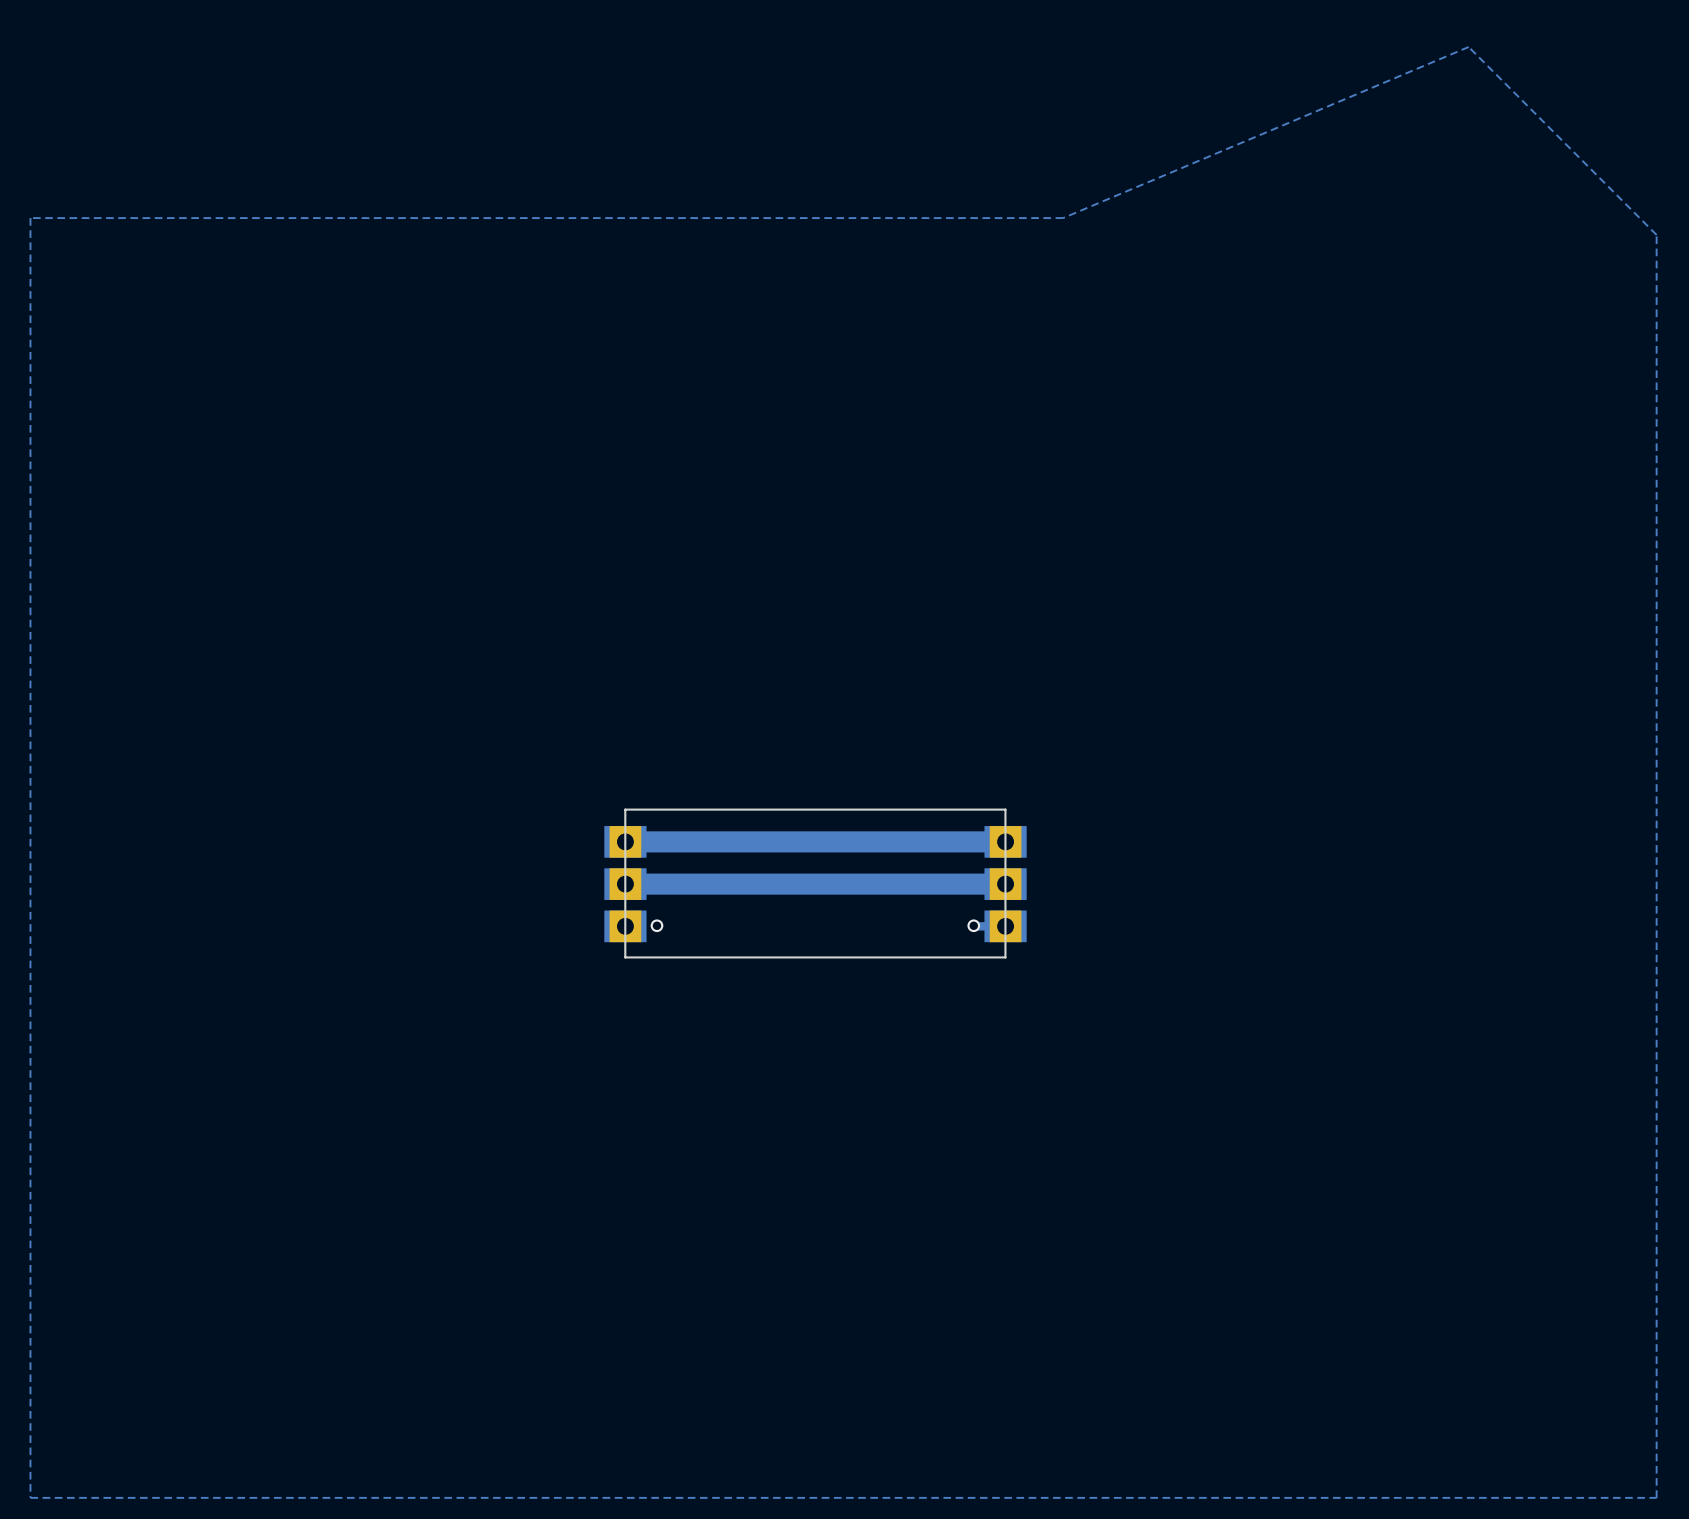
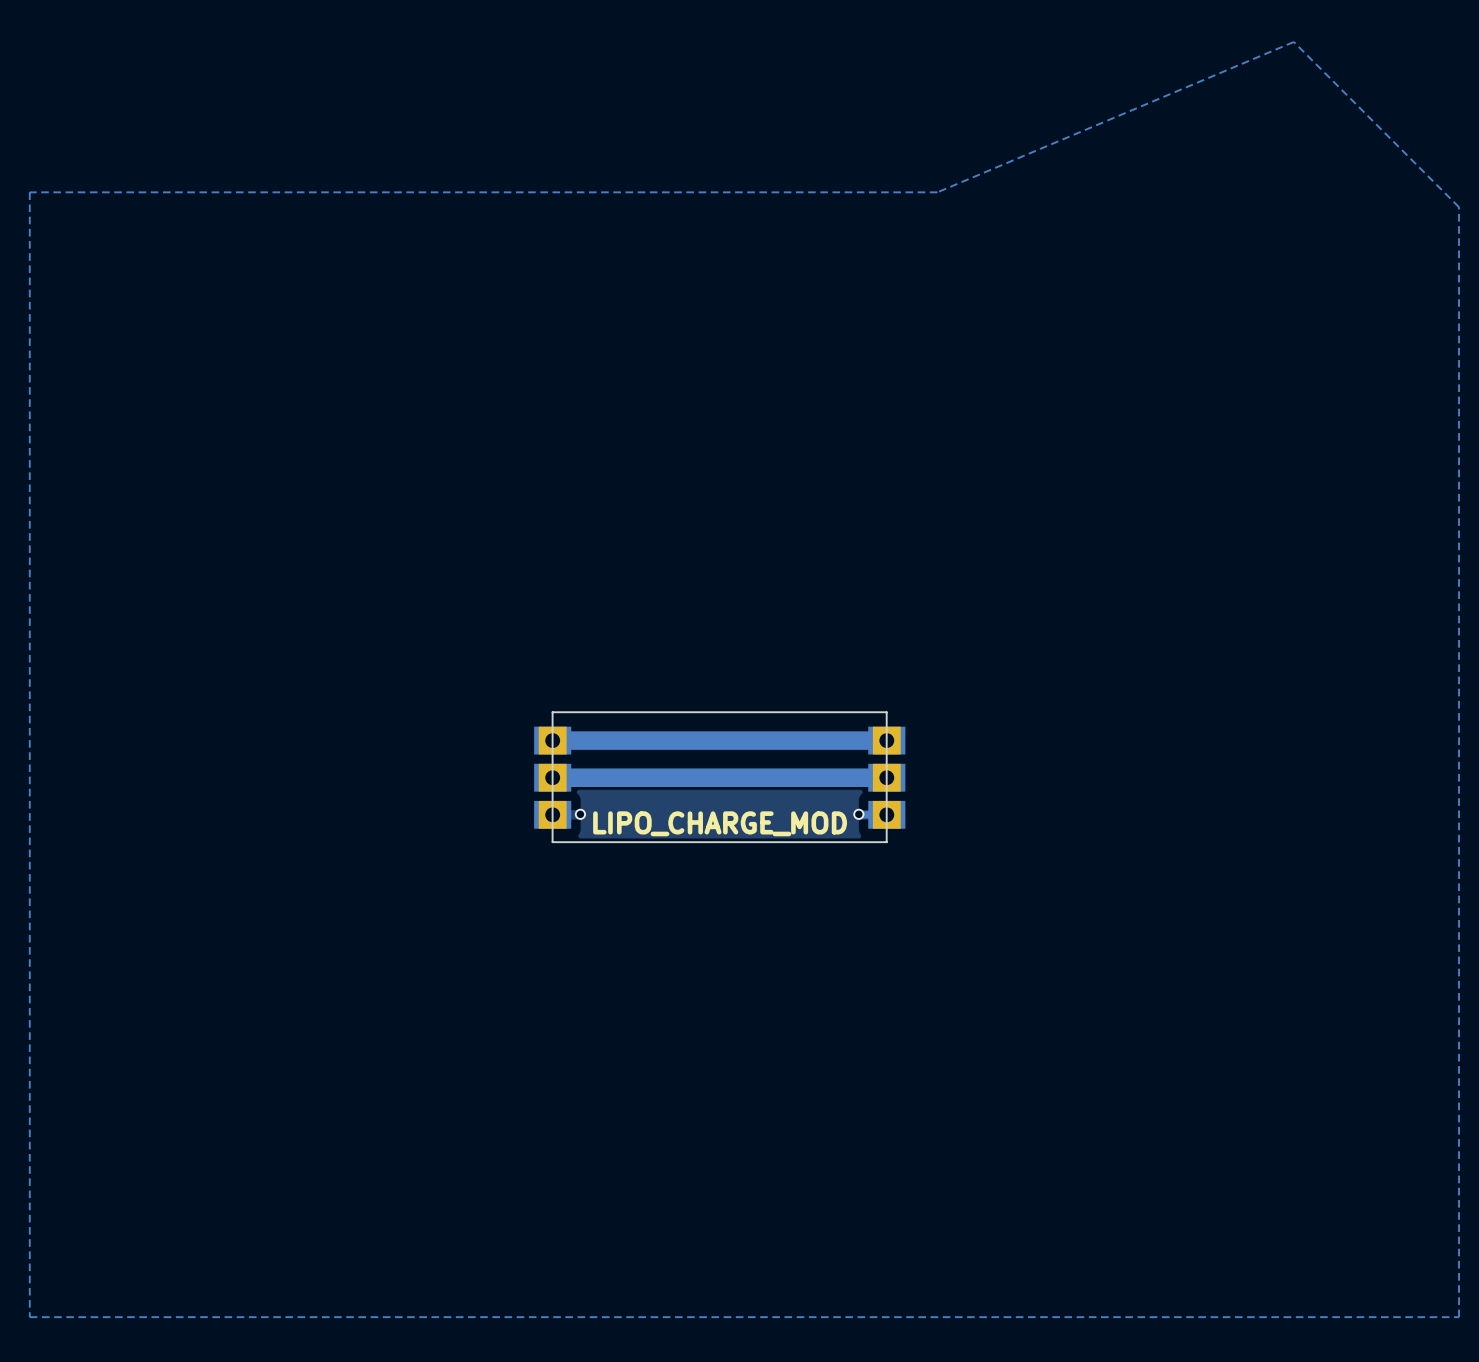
text: none -> LIPO_CHARGE_MOD (720, 823)

